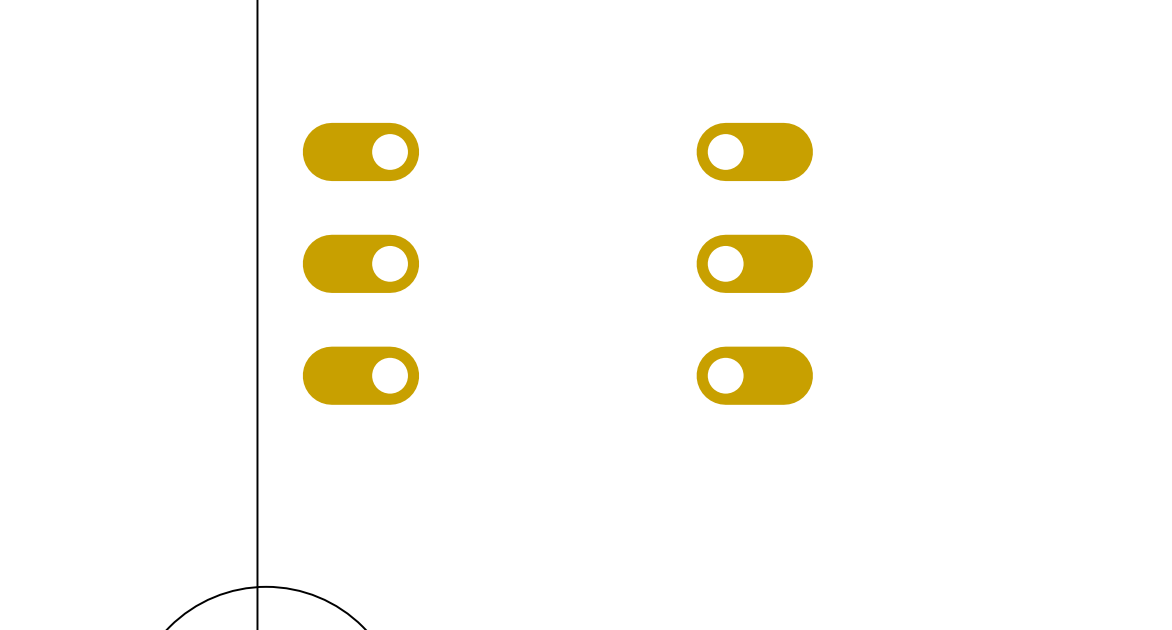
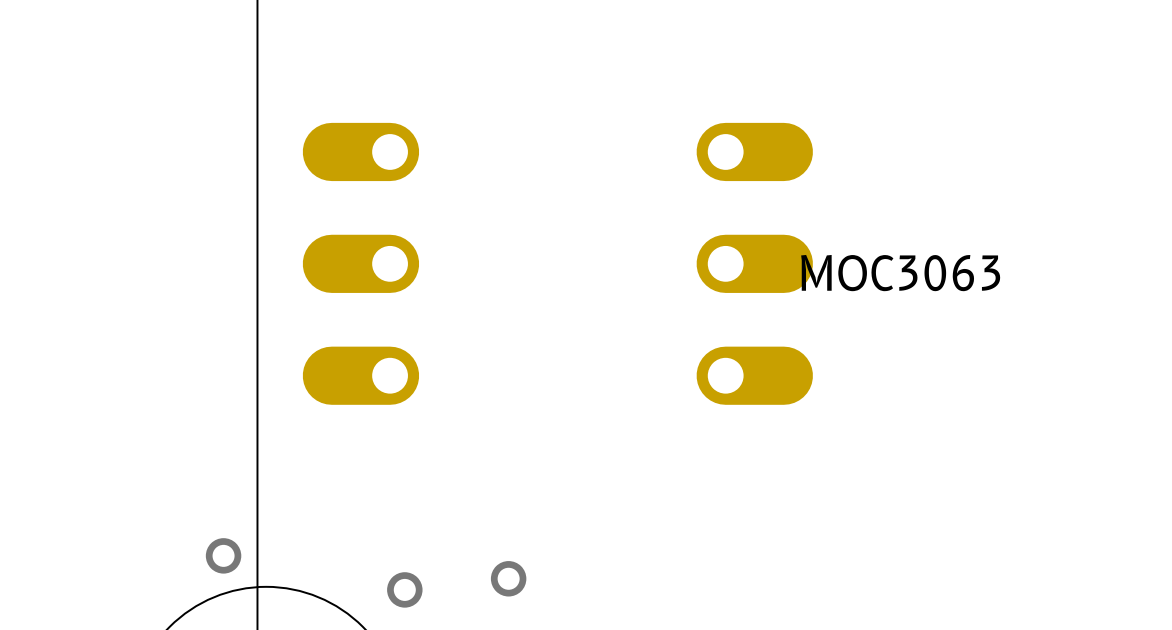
text: none -> MOC3063 (900, 273)
via: none -> (223, 555)
via: none -> (508, 578)
via: none -> (404, 589)

